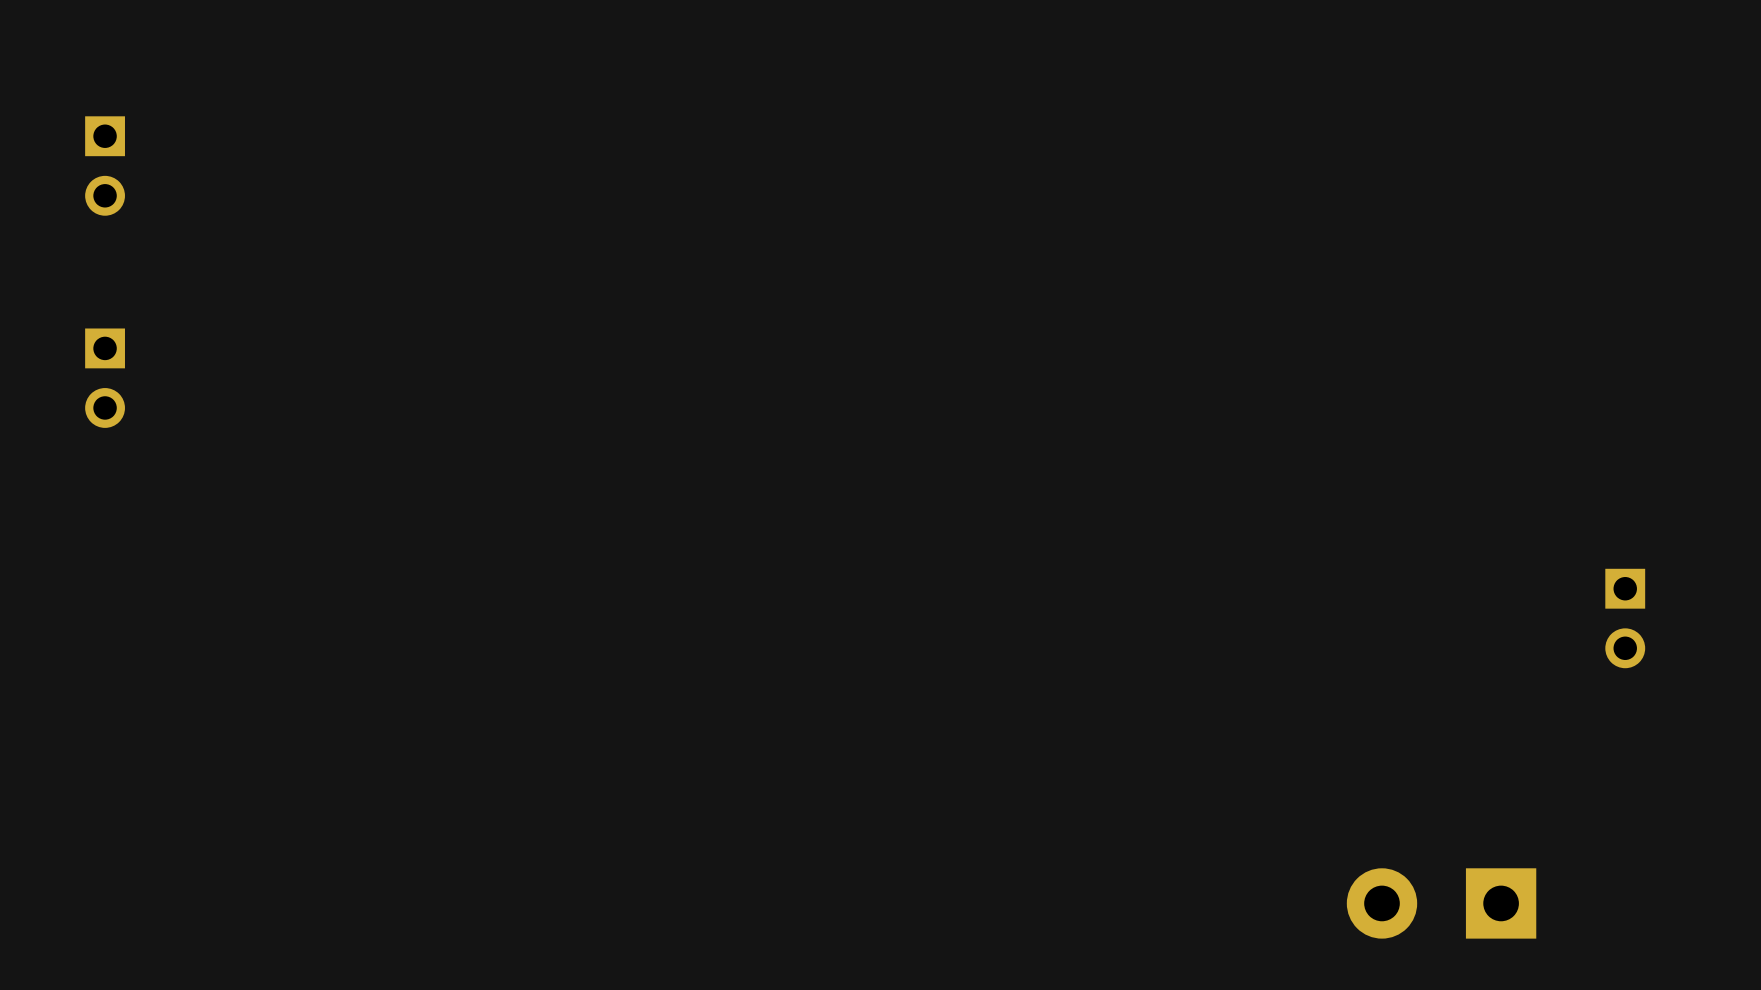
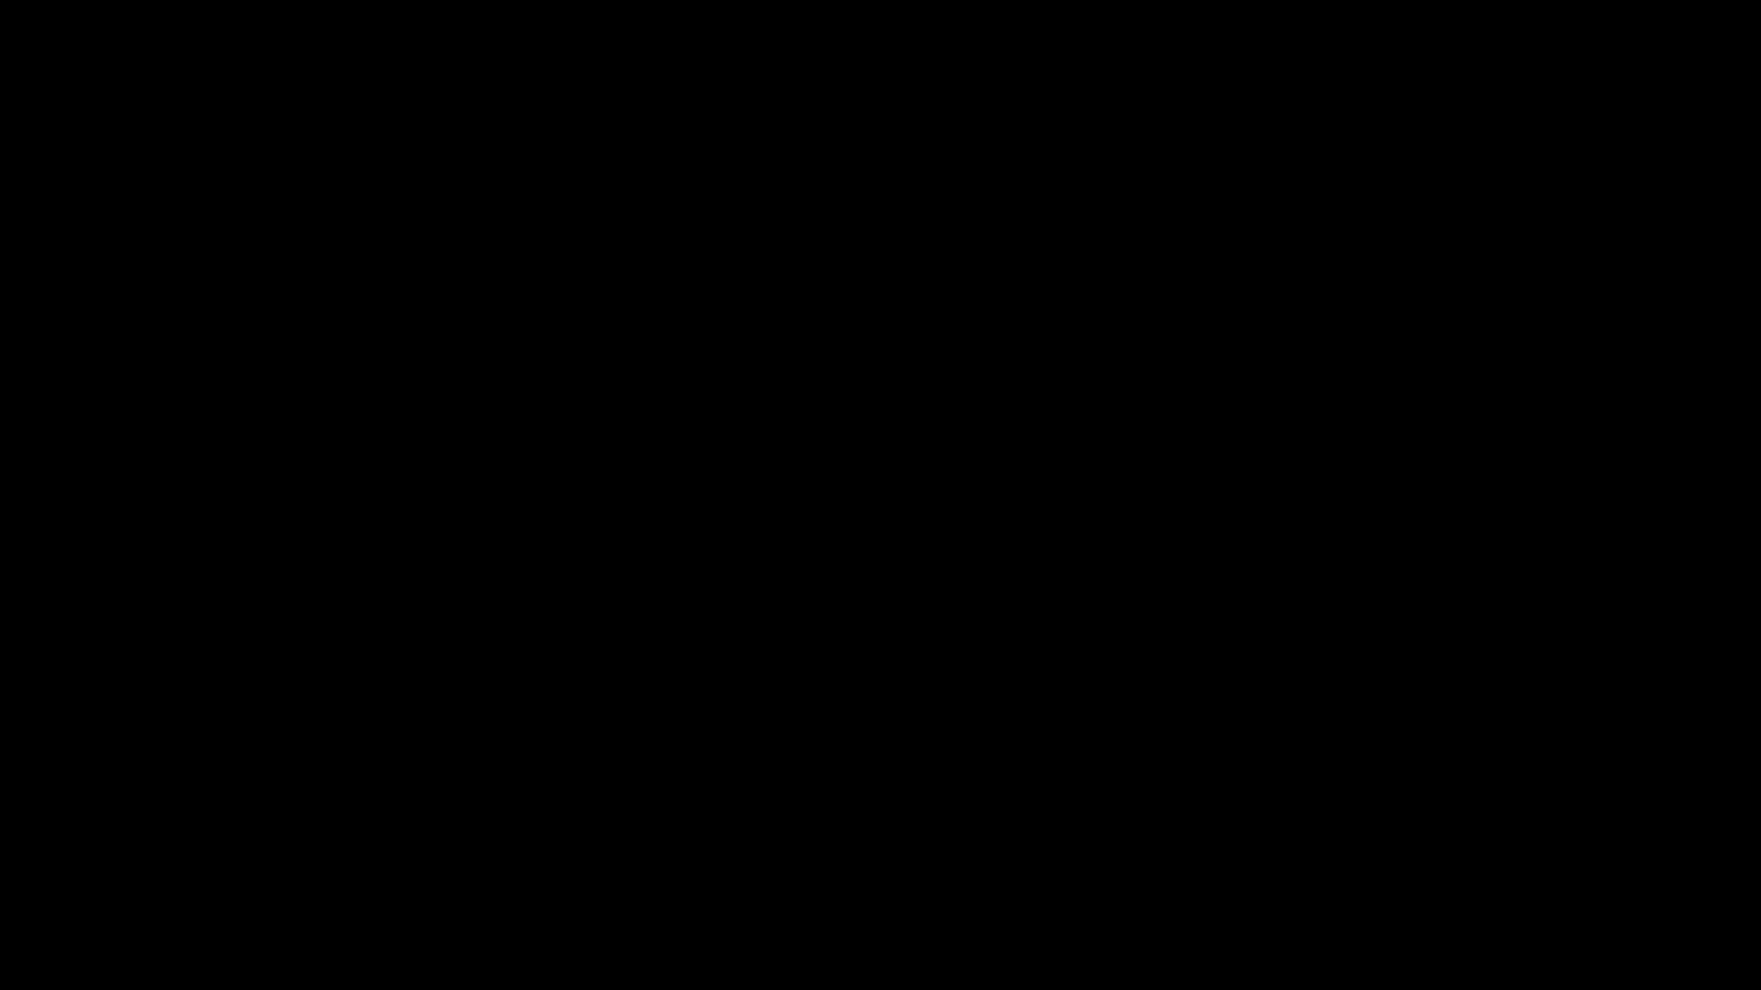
part: (105, 166) -> none
part: (105, 378) -> none
part: (1625, 618) -> none
part: (1441, 903) -> none

